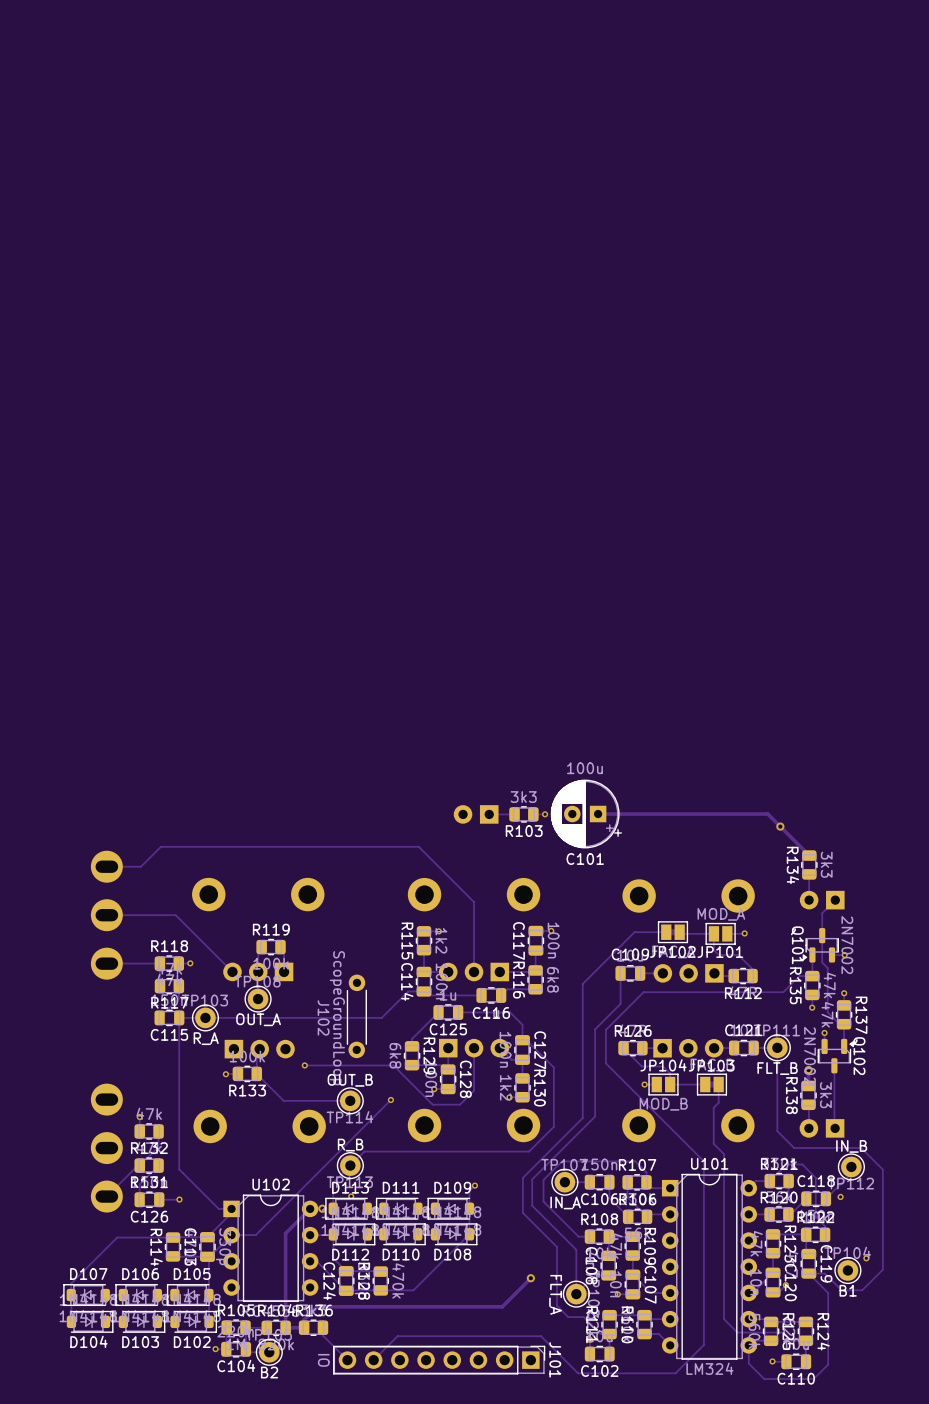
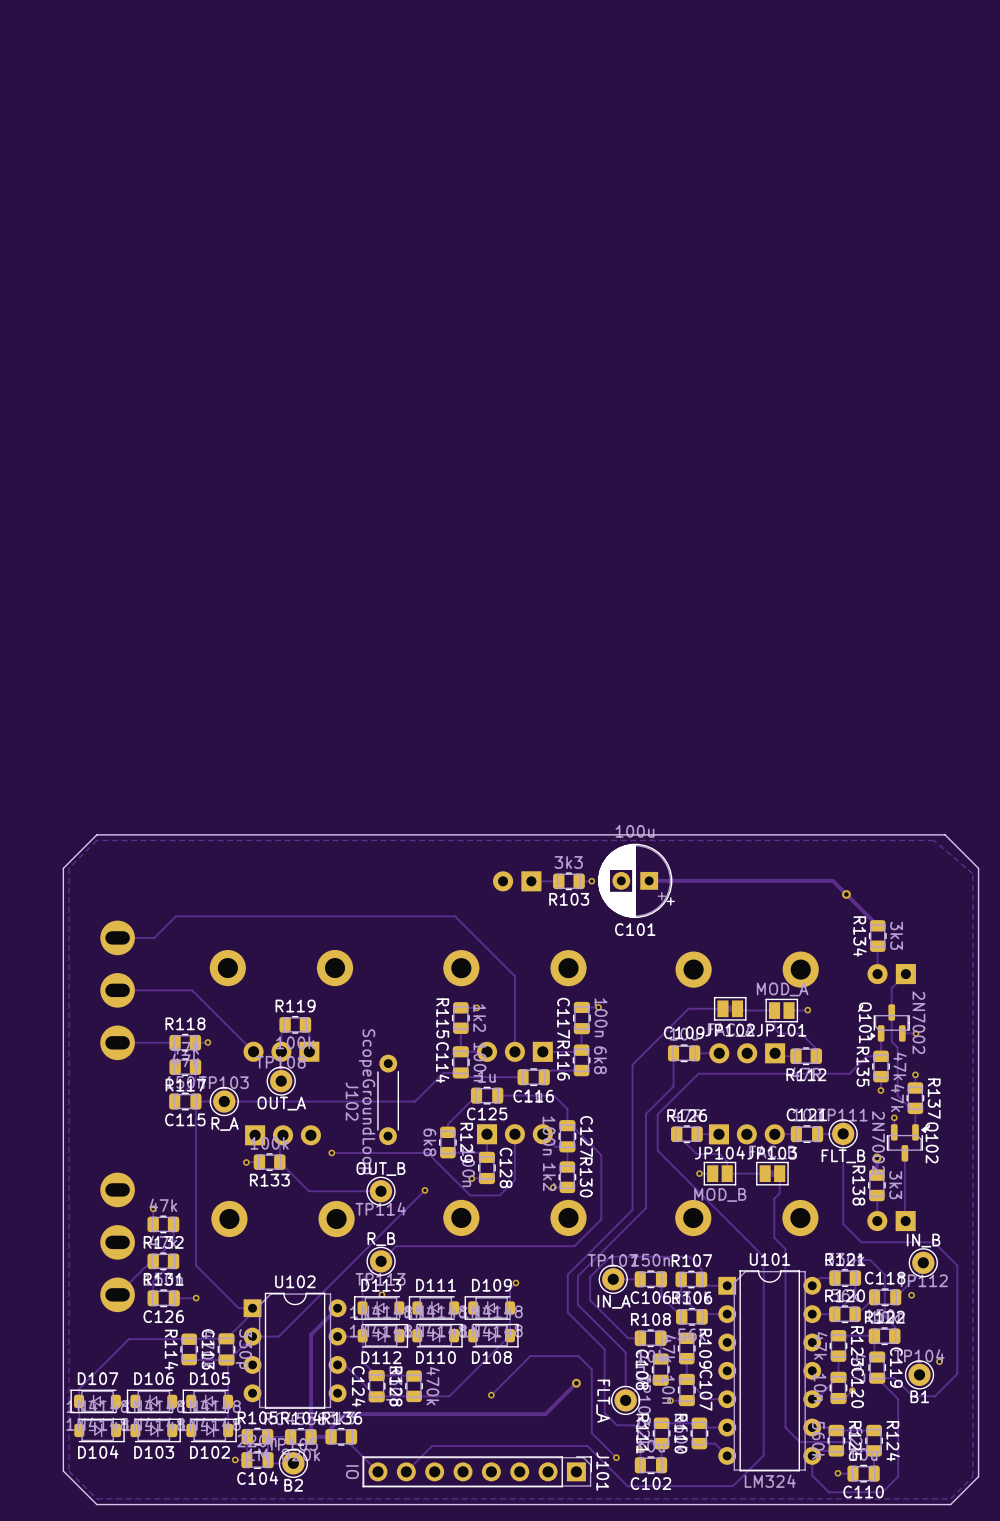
board edge: none -> (945, 834) (96, 834) (63, 868) (63, 1471) (96, 1504) (950, 1504) (978, 1476) (978, 868) (945, 834)
zone outline: none -> (933, 840) (972, 873) (972, 1476) (950, 1498) (96, 1498) (68, 1471) (68, 868) (96, 840) (933, 840)
via: (322, 1208) -> none
track: none -> (491, 1395) (530, 1356) (578, 1356) (591, 1369) (591, 1433) (616, 1457)
via: none -> (491, 1395)
via: none -> (616, 1457)

